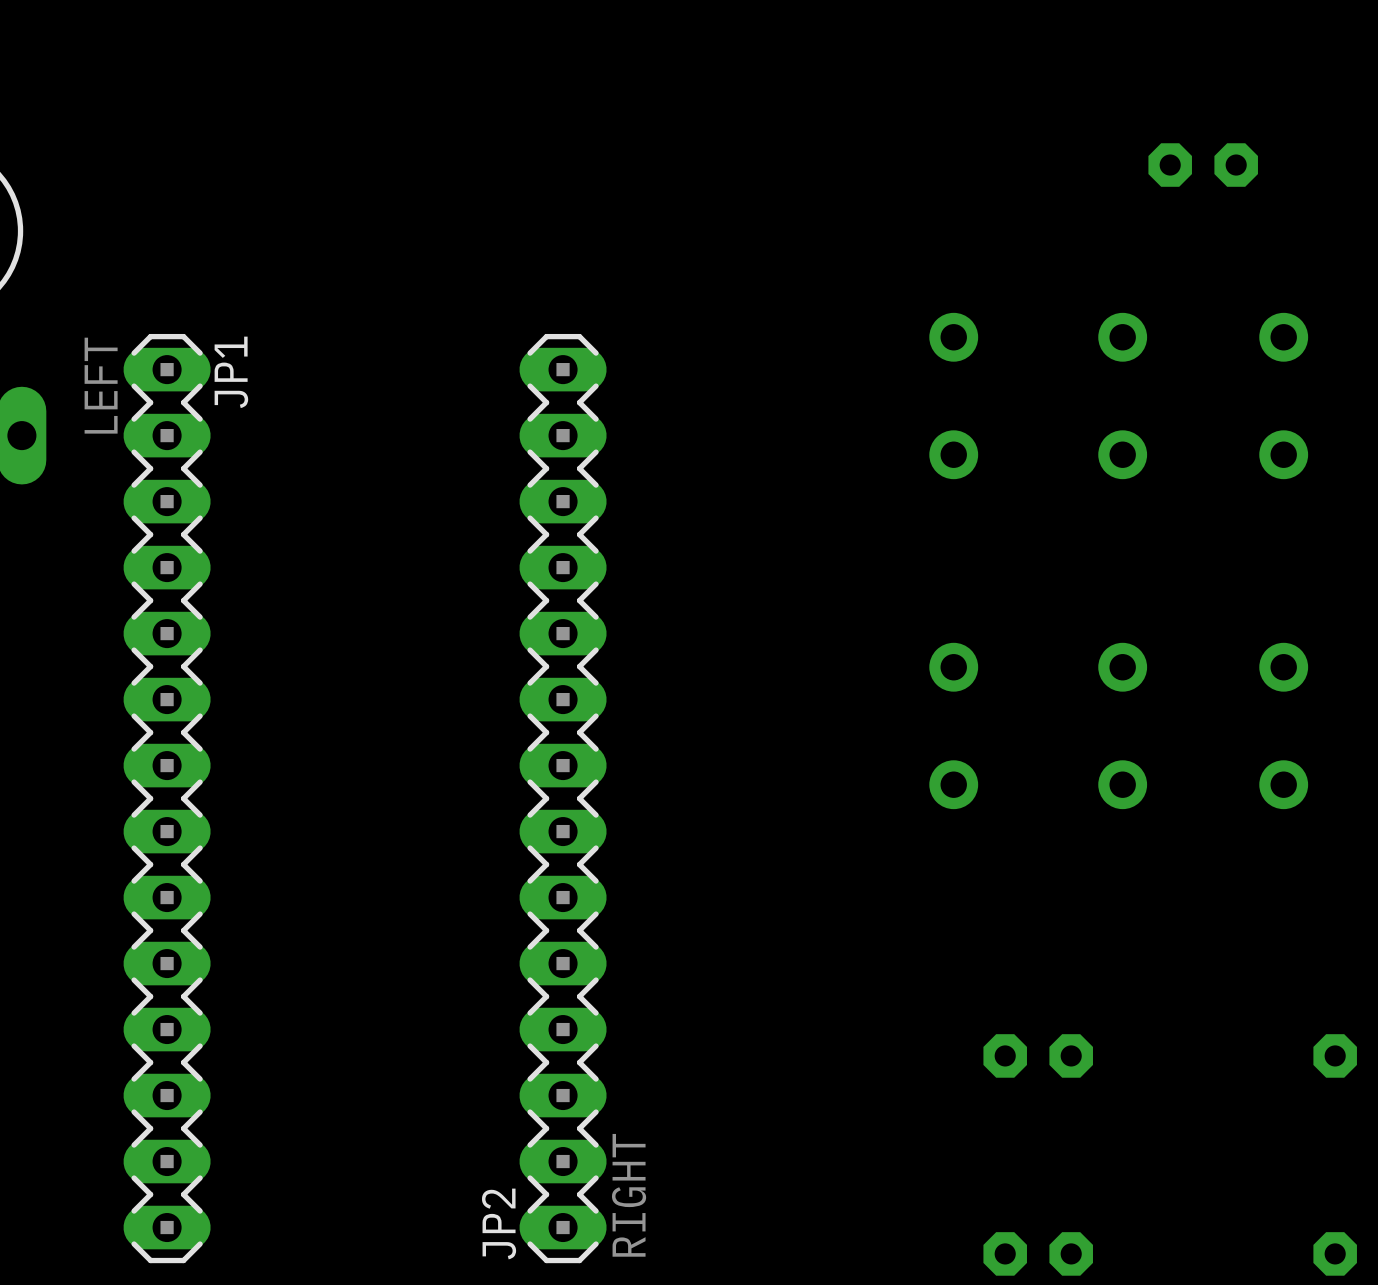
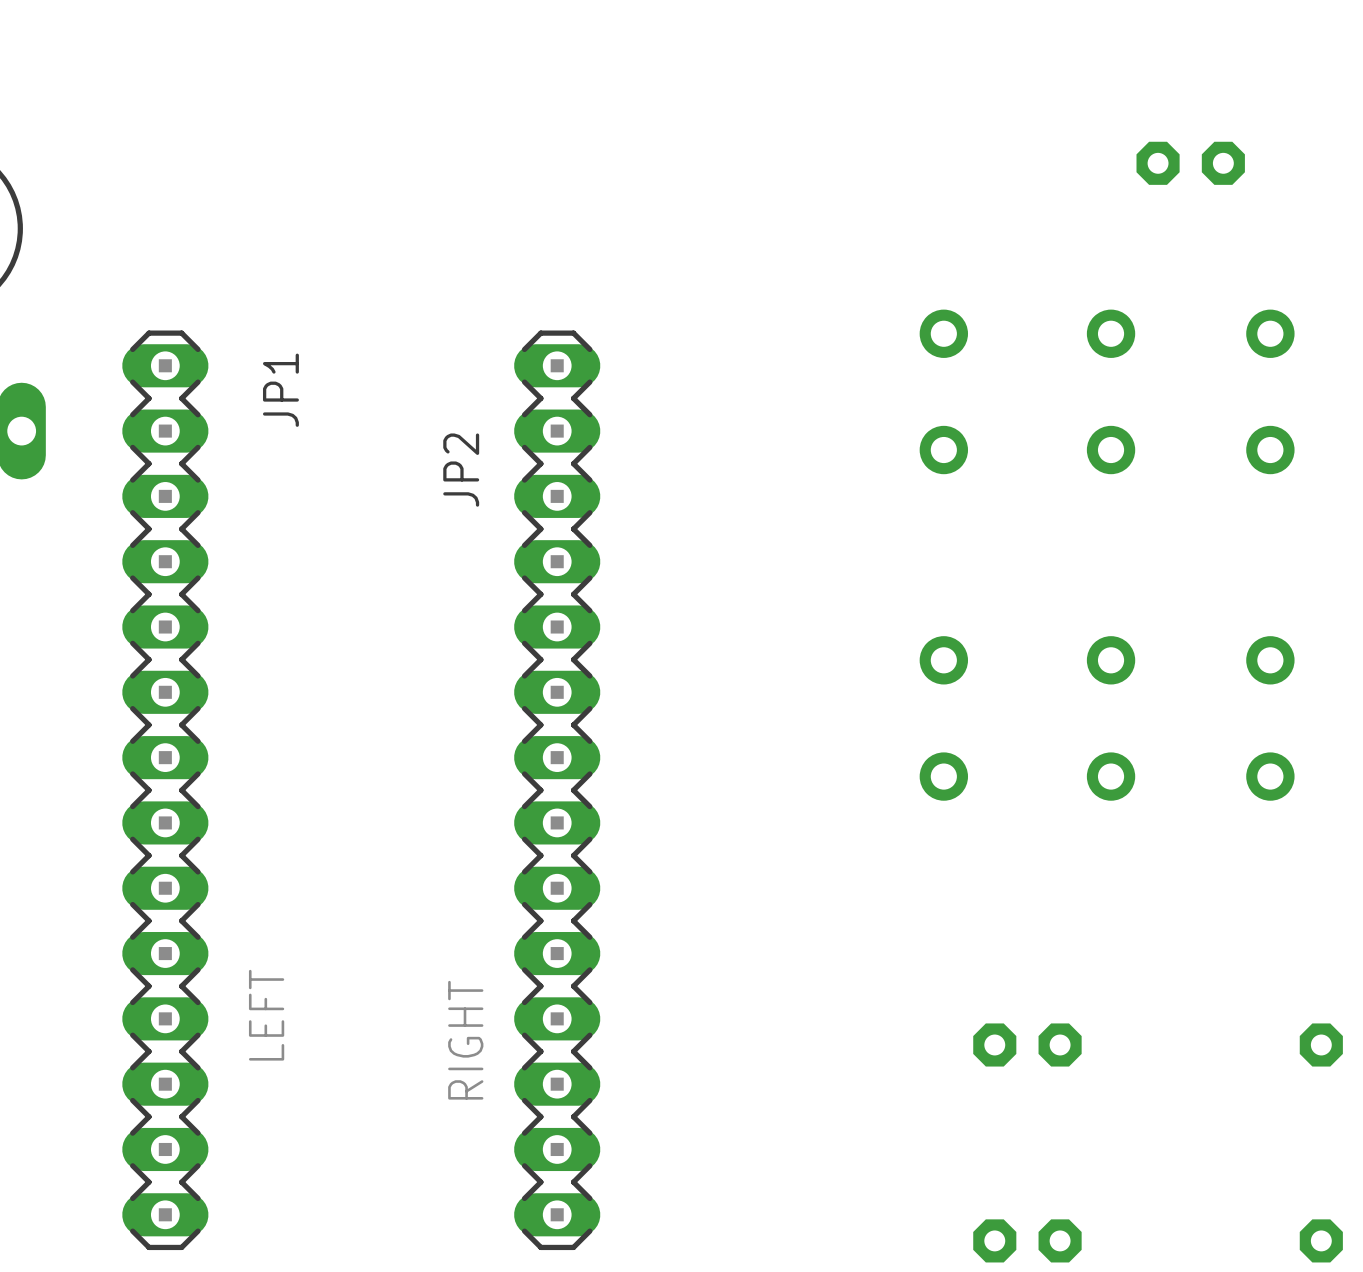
JP1 name position: JP1 (231, 372) -> JP1 (280, 390)
JP1 value position: LEFT (101, 385) -> LEFT (266, 1015)
JP2 value position: RIGHT (629, 1195) -> RIGHT (465, 1040)
JP2 name position: JP2 (499, 1223) -> JP2 (461, 470)

